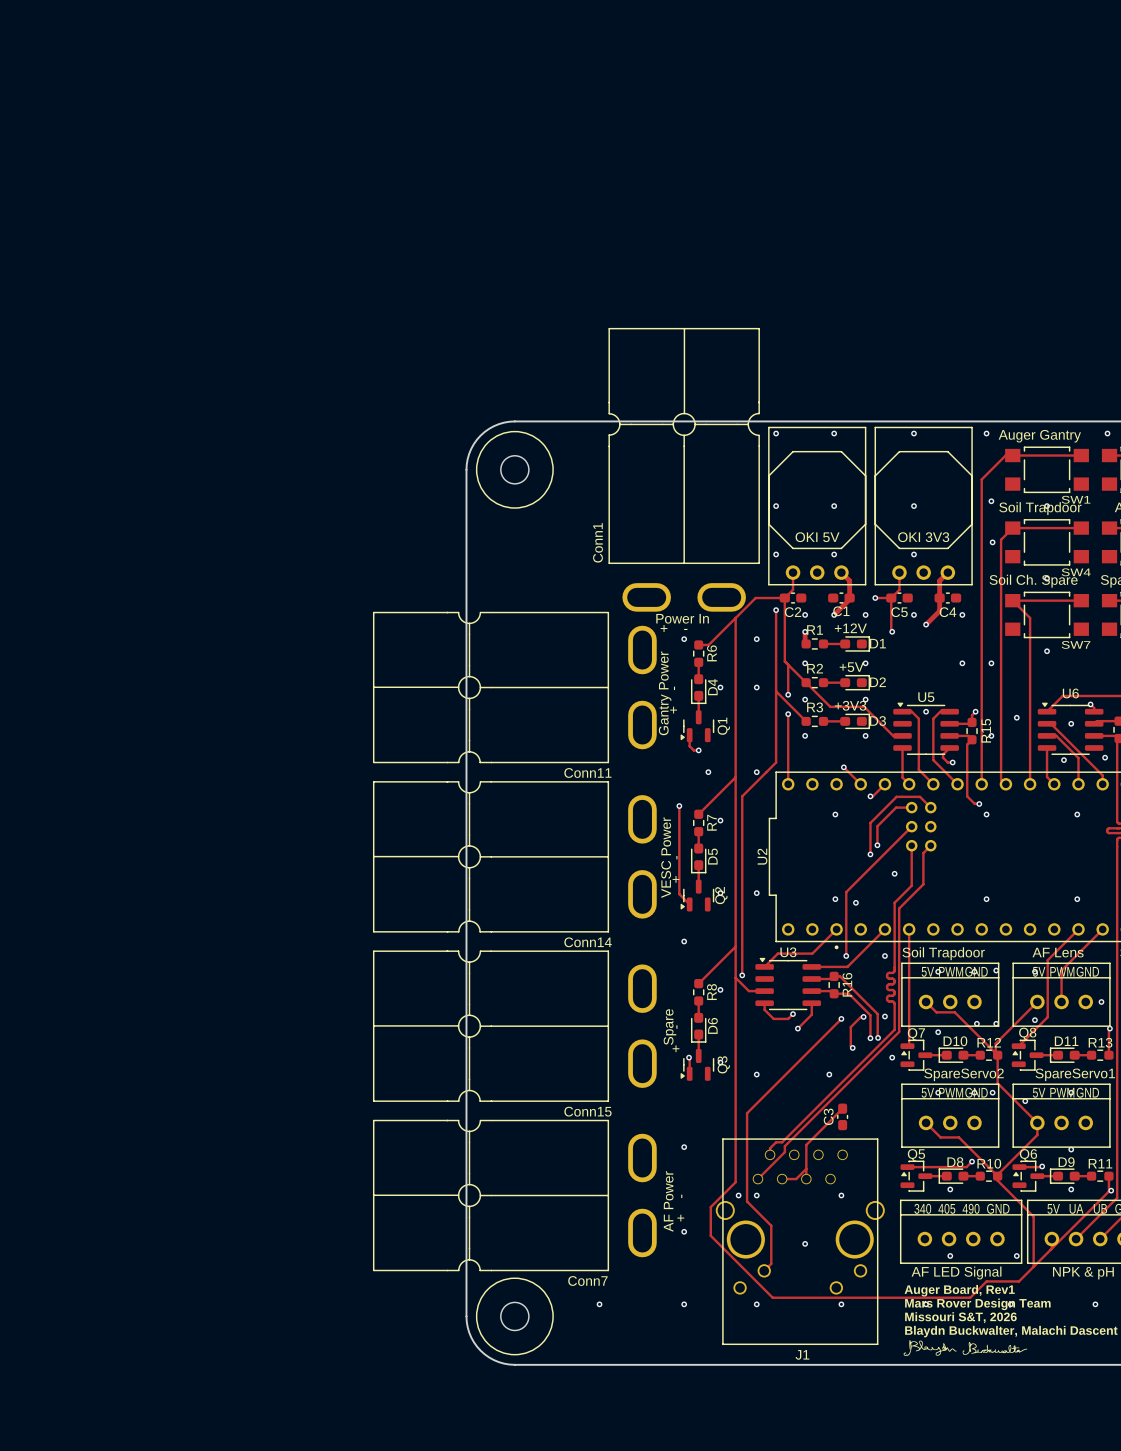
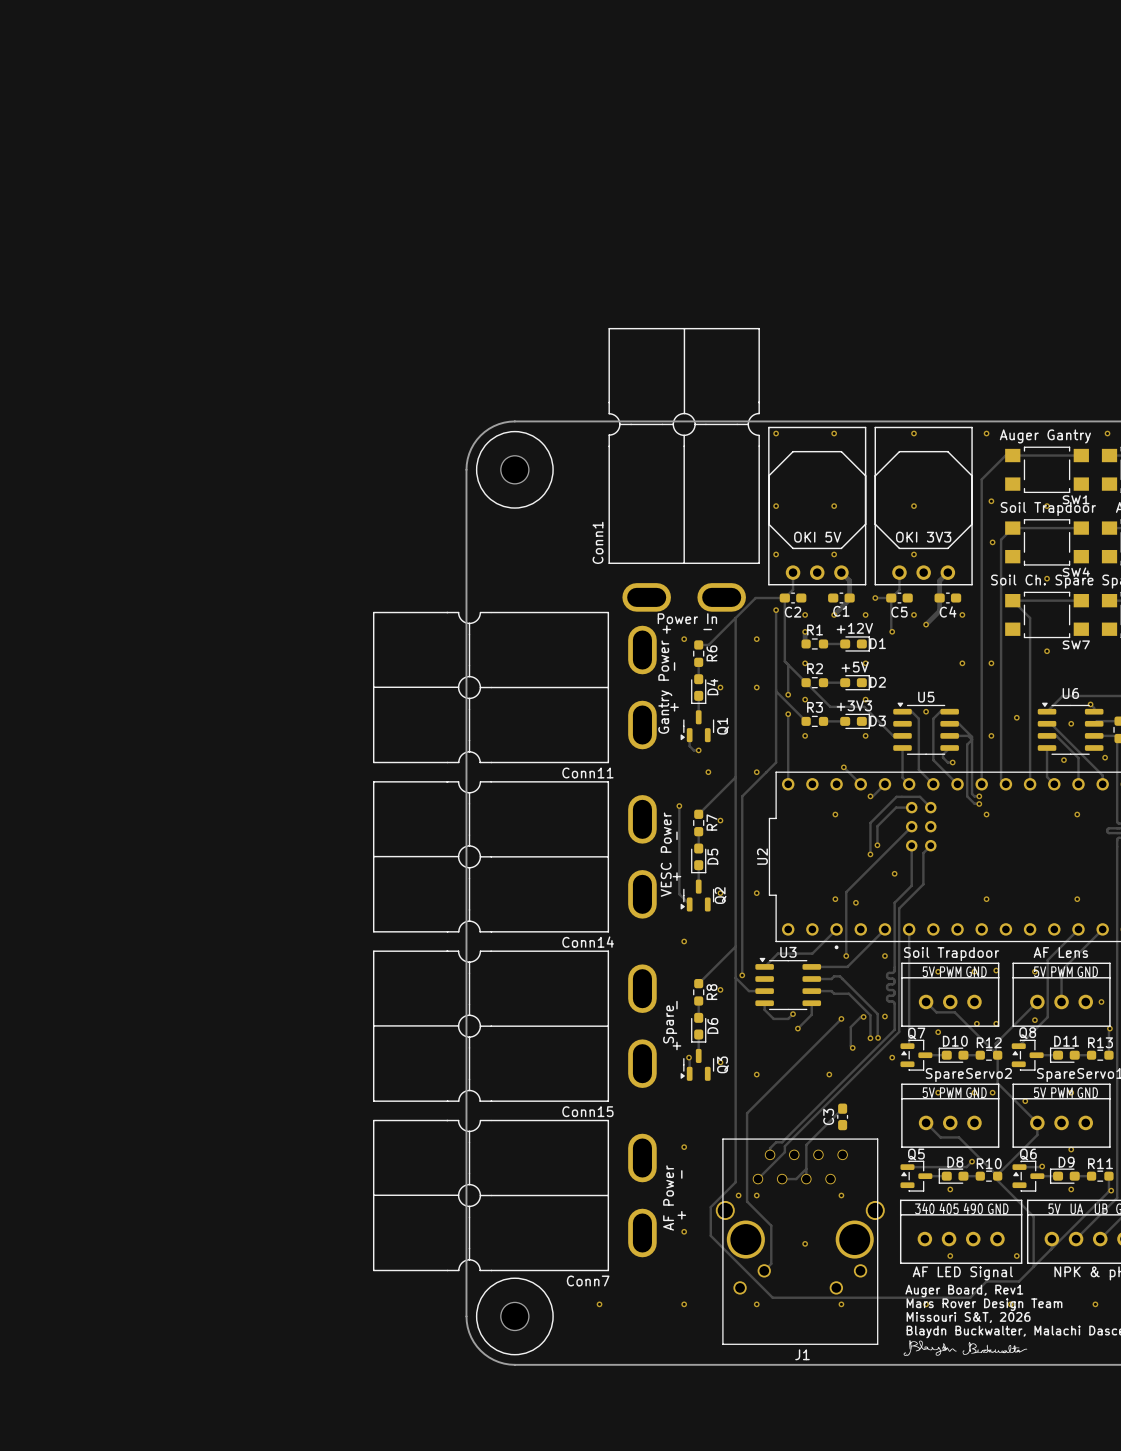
track: (975, 711) (972, 715) (970, 723) (958, 723) -> (979, 796) (974, 796) (972, 793) (972, 736) (958, 723)
via: (975, 711) -> none
R15: (972, 731) -> none
via: none -> (979, 796)
R16: (834, 985) -> none

